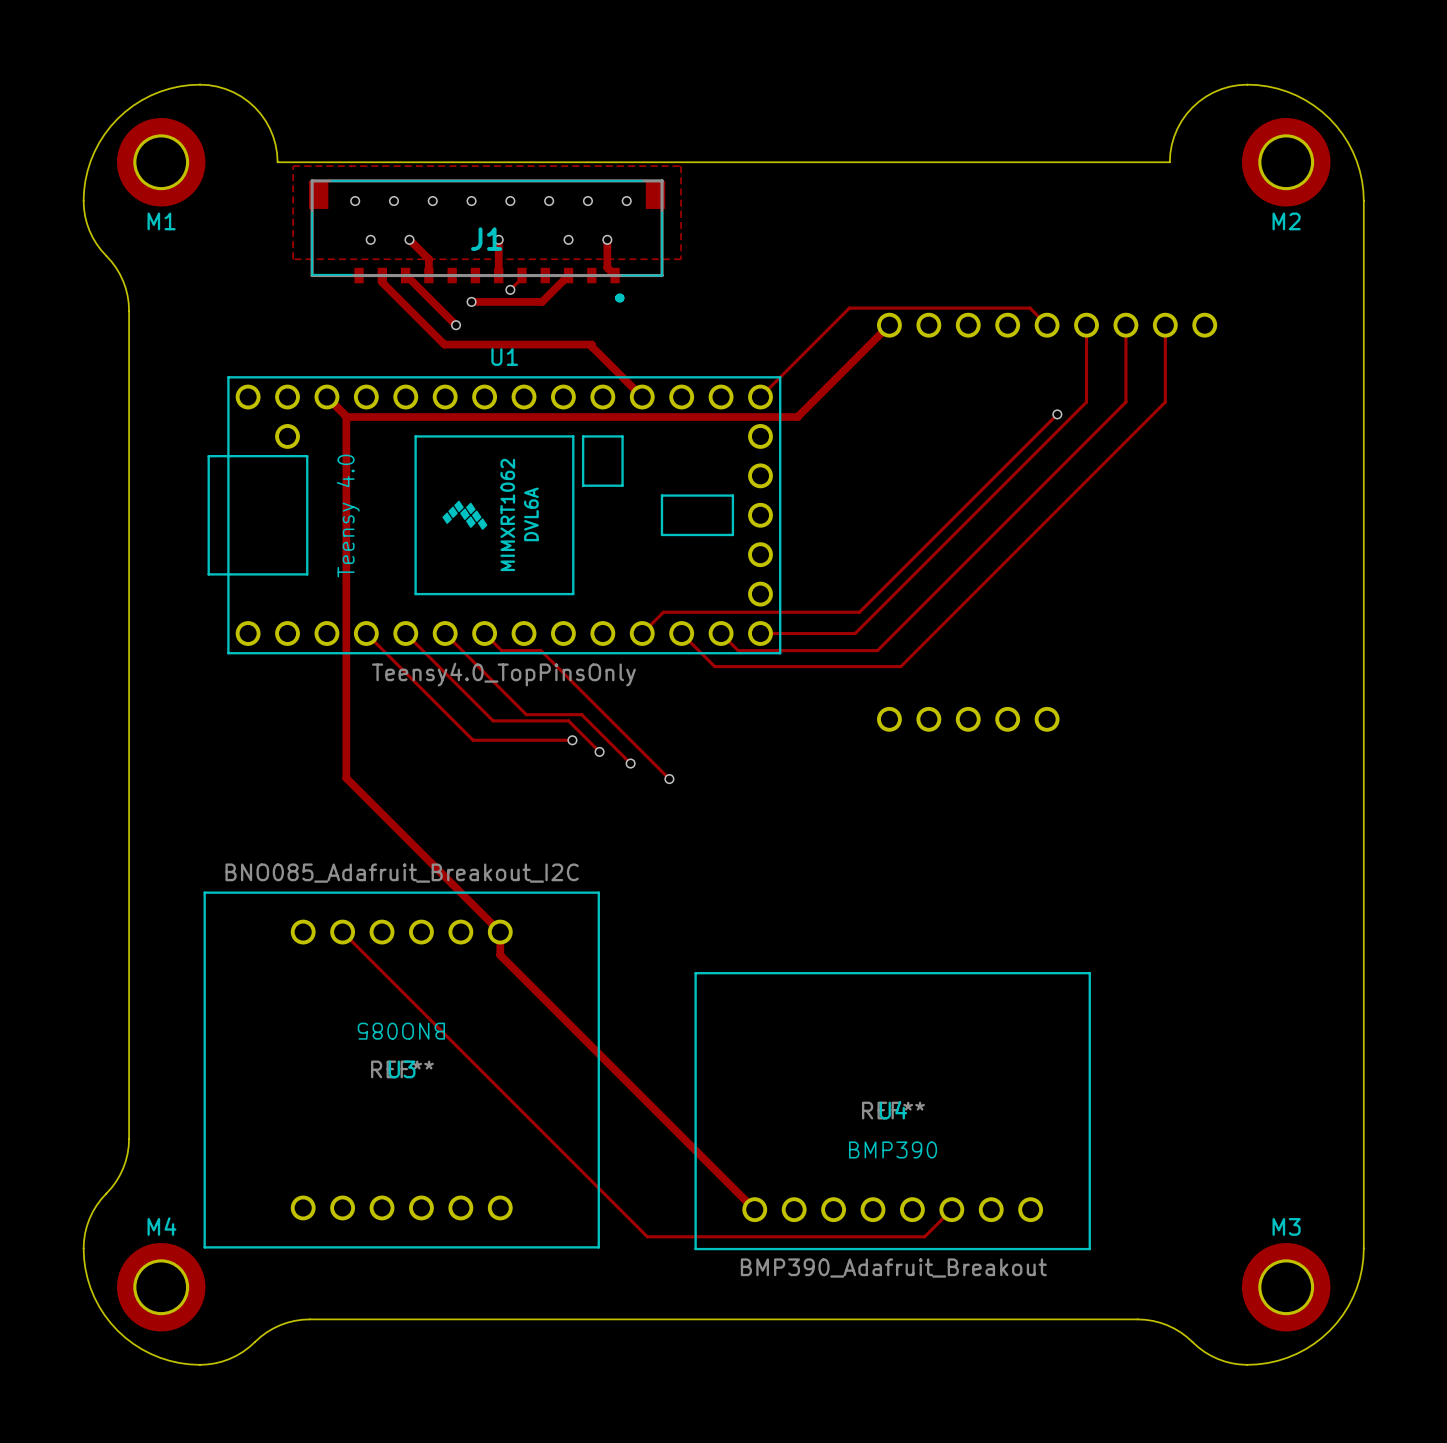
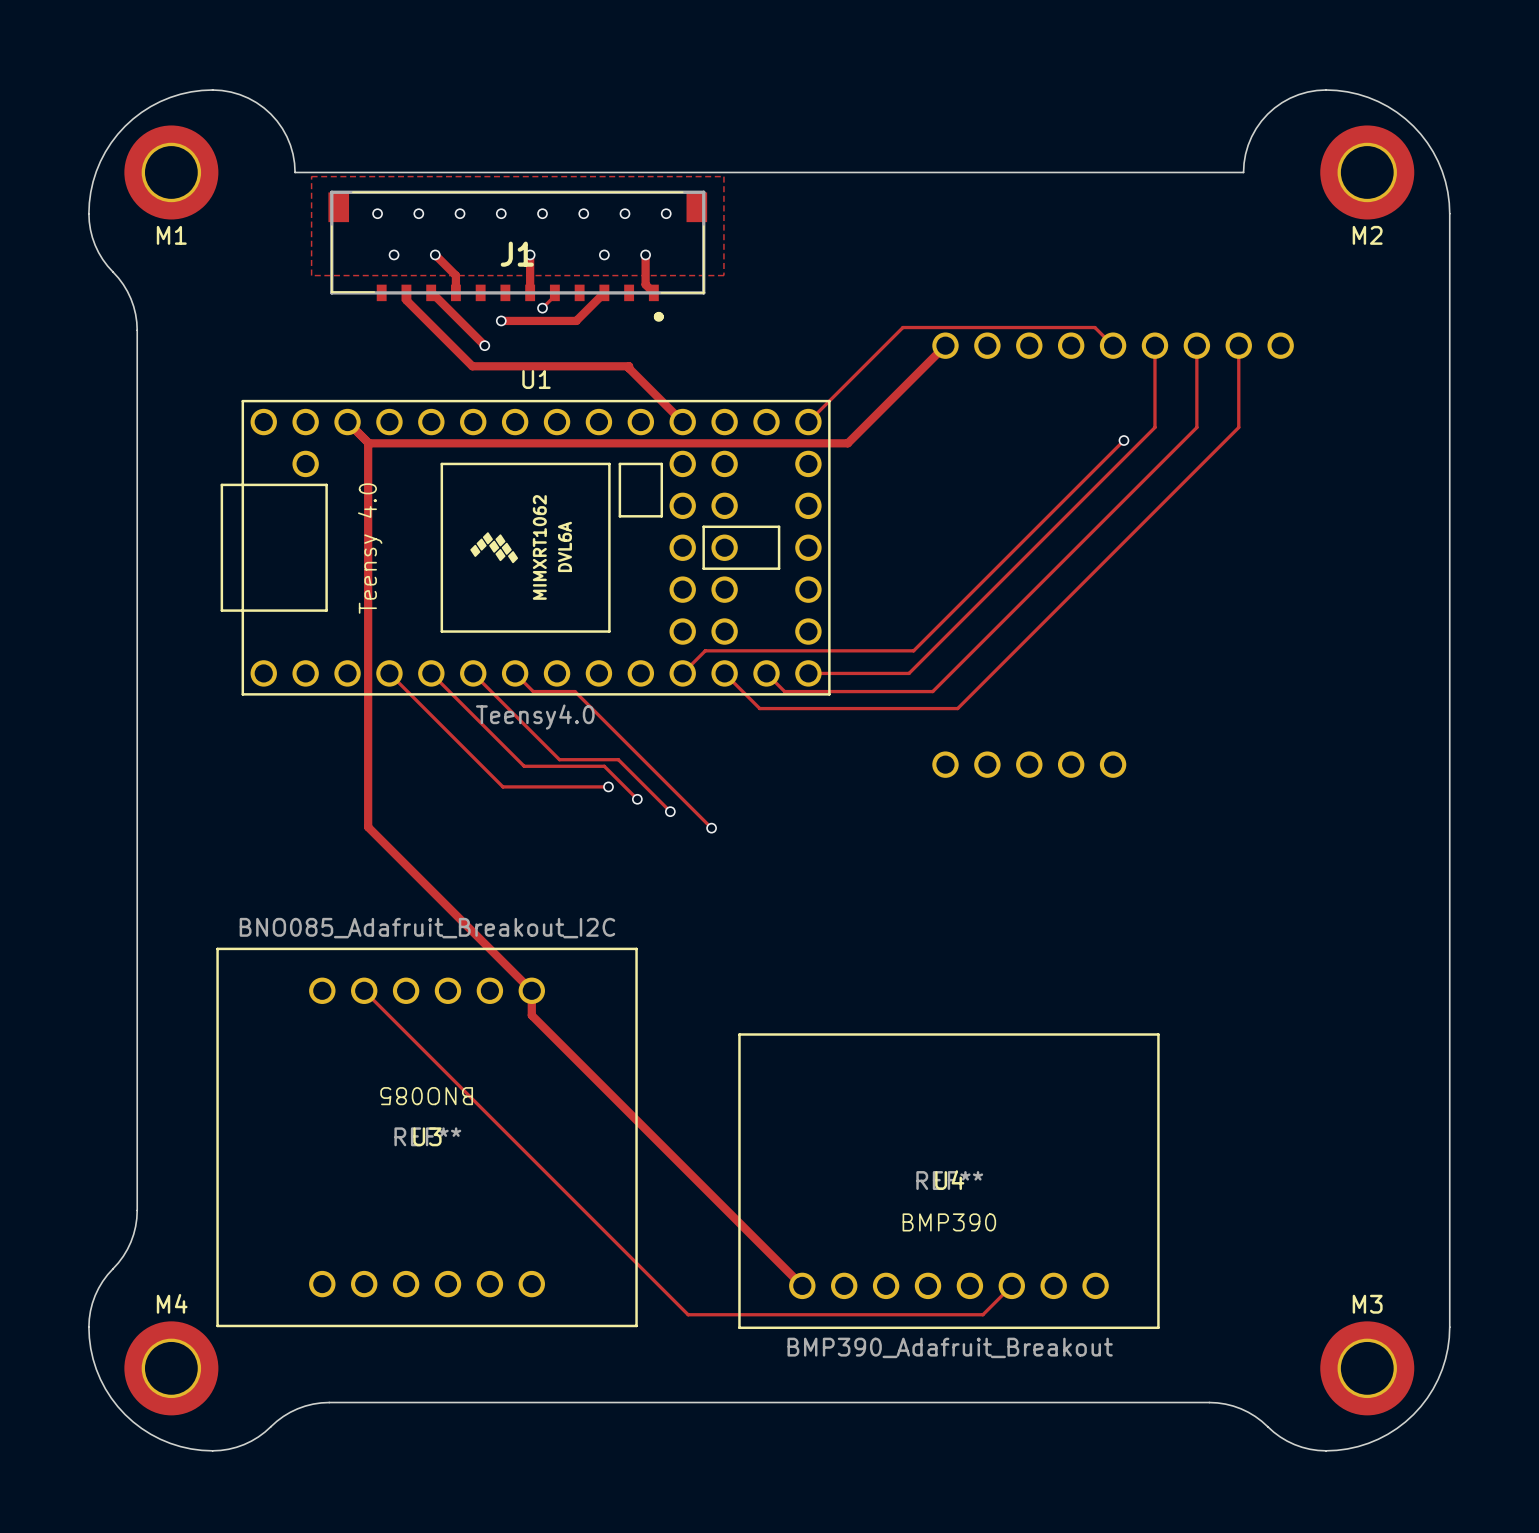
U1 footprint: [207, 376, 782, 655] -> [220, 399, 831, 696]
U1 value: Teensy4.0_TopPinsOnly (503, 674) -> Teensy4.0 (535, 717)

